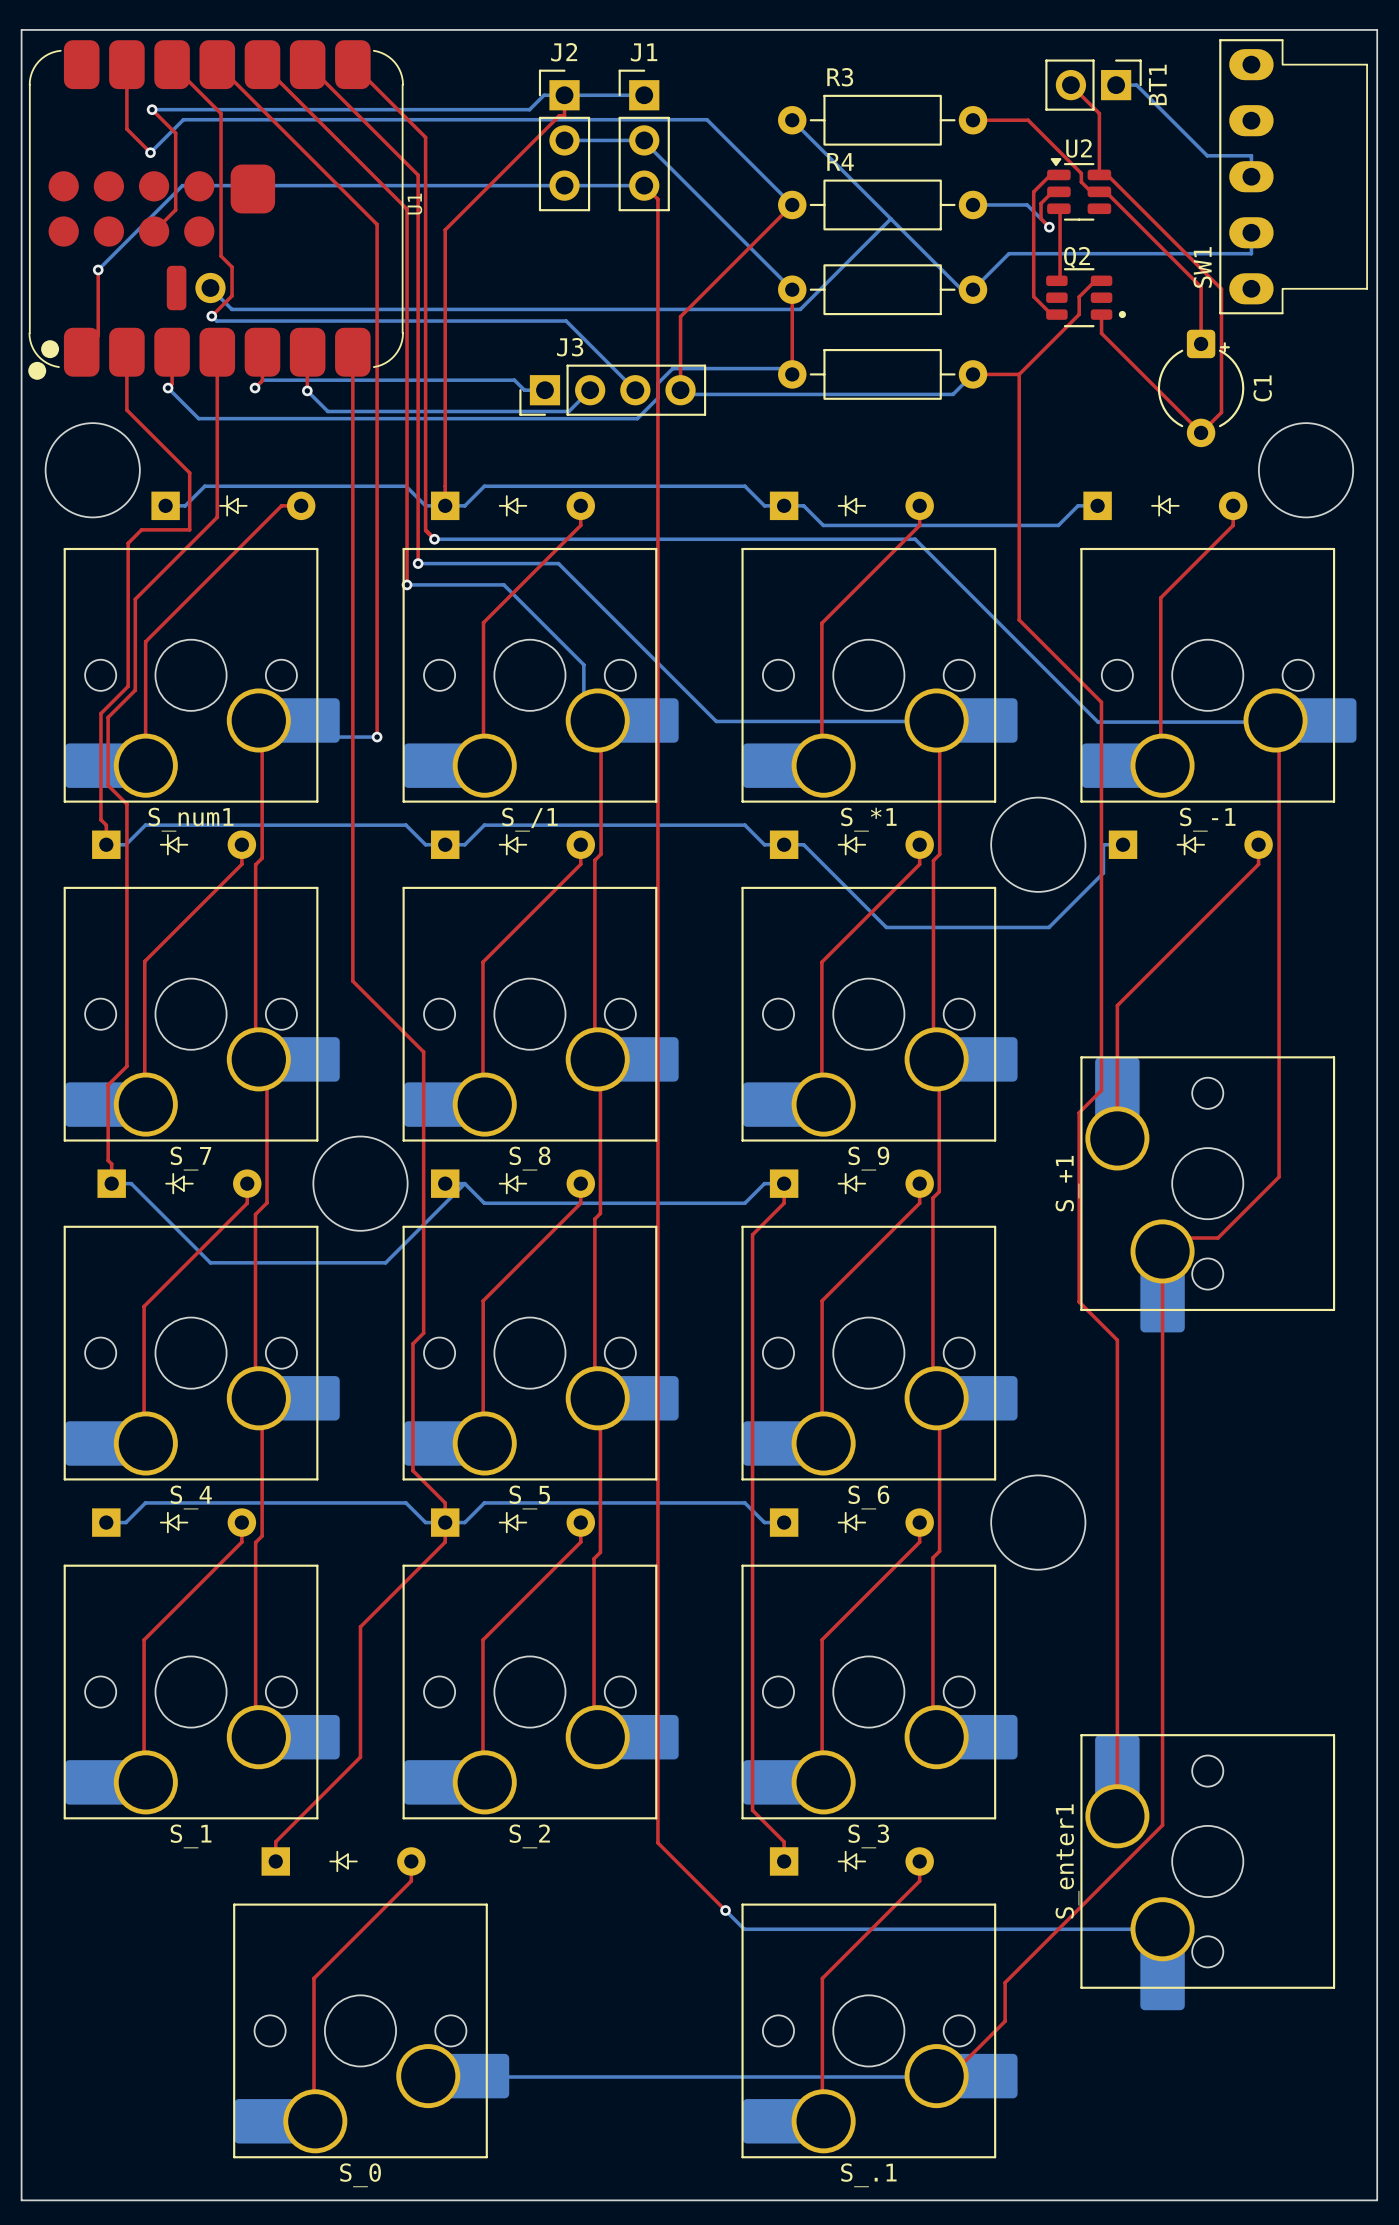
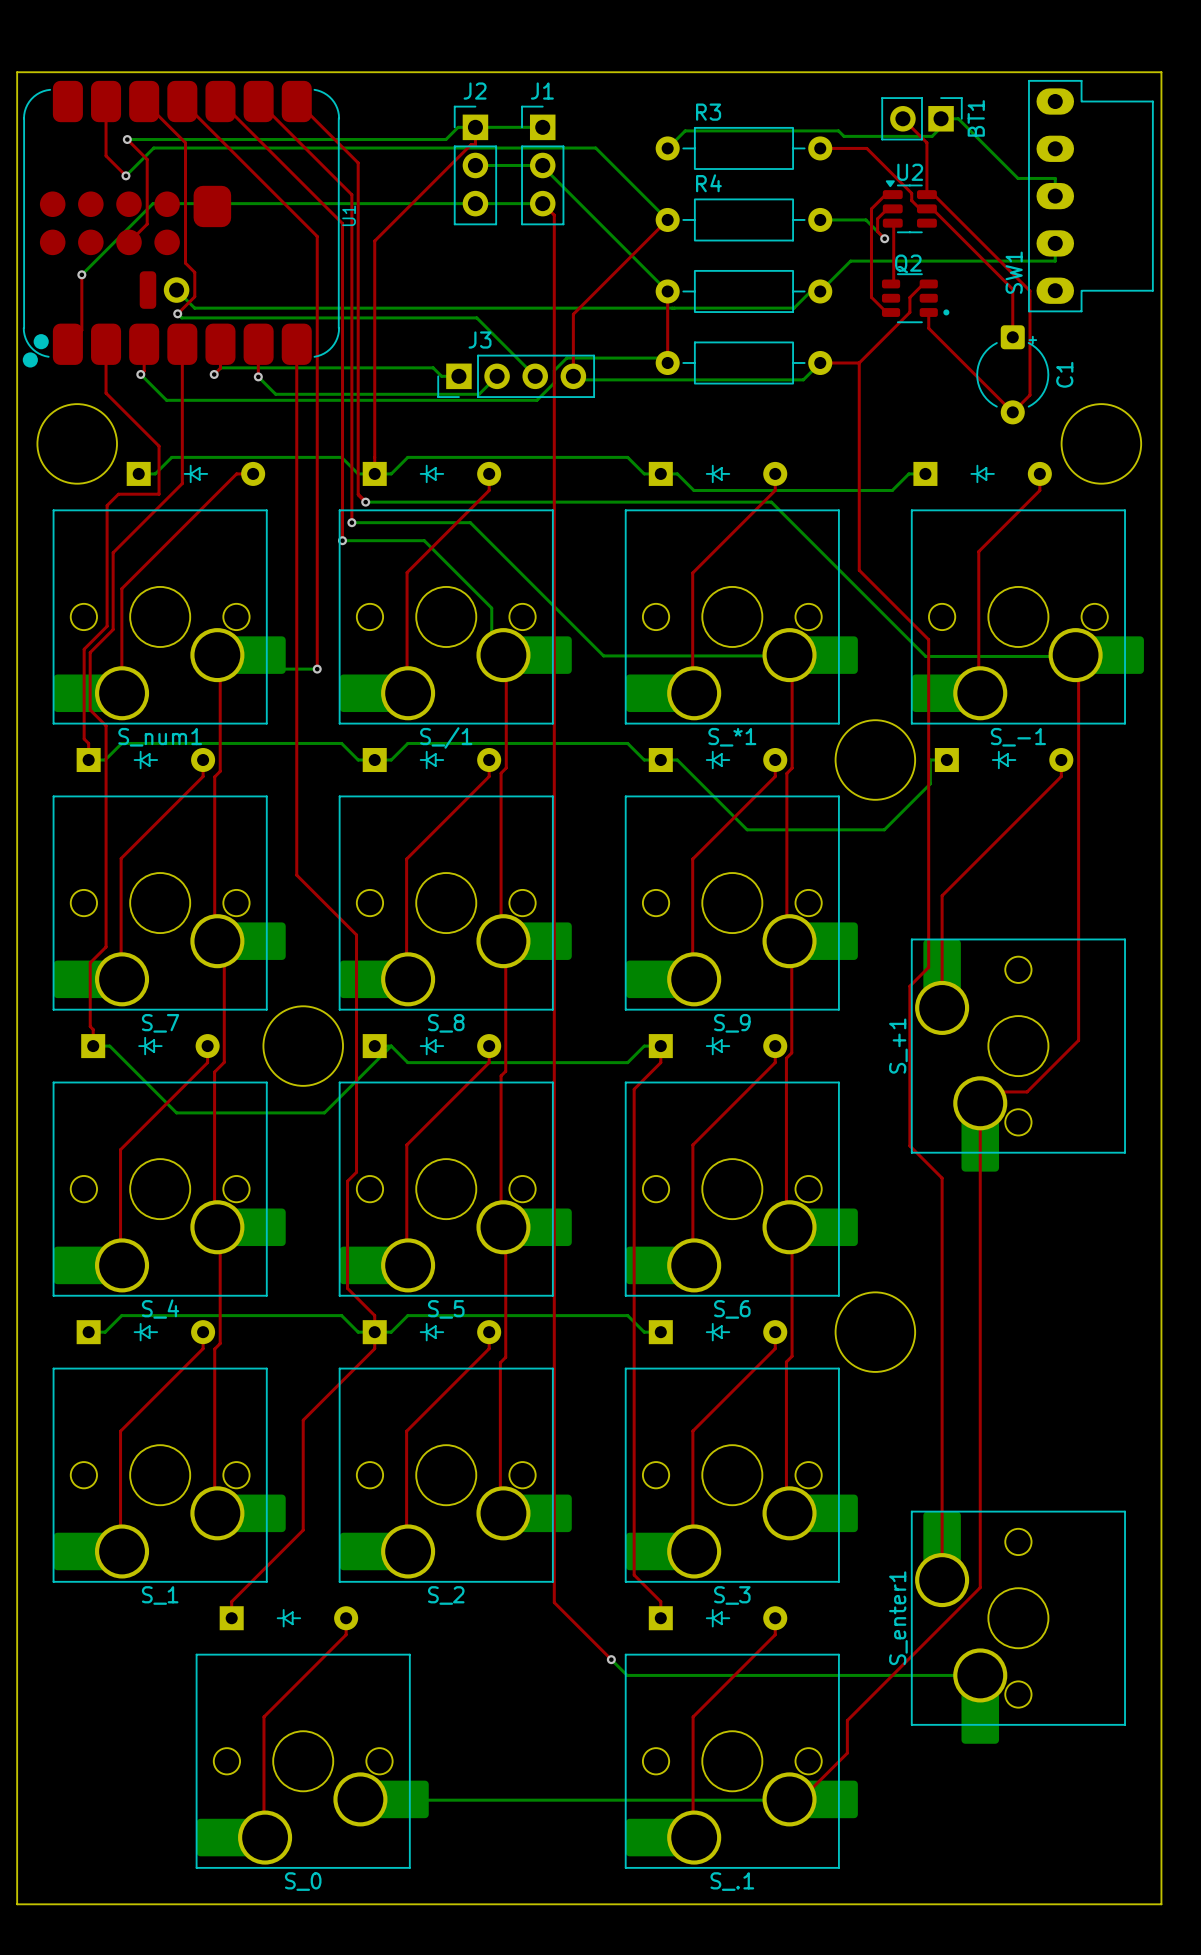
bottom track: (792, 120) (961, 289) -> (667, 148) (685, 130) (838, 130) (844, 136) (932, 136) (949, 118)
bottom track: (890, 218) (800, 309) -> (810, 291) (794, 308) (674, 308)

